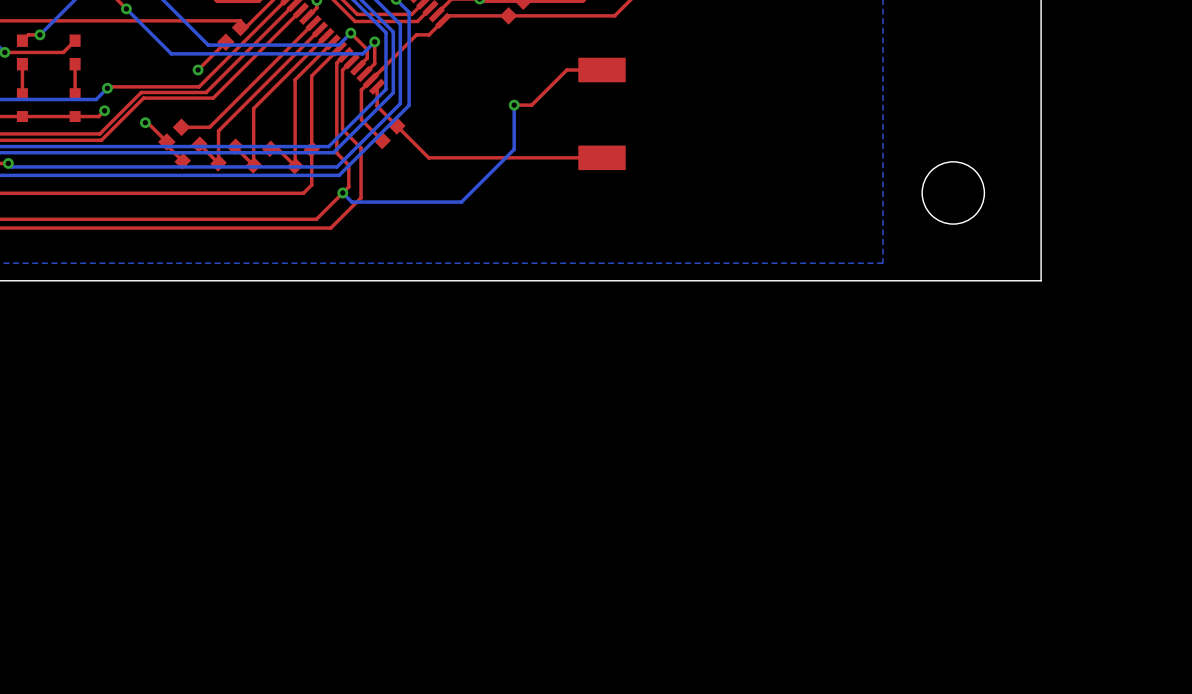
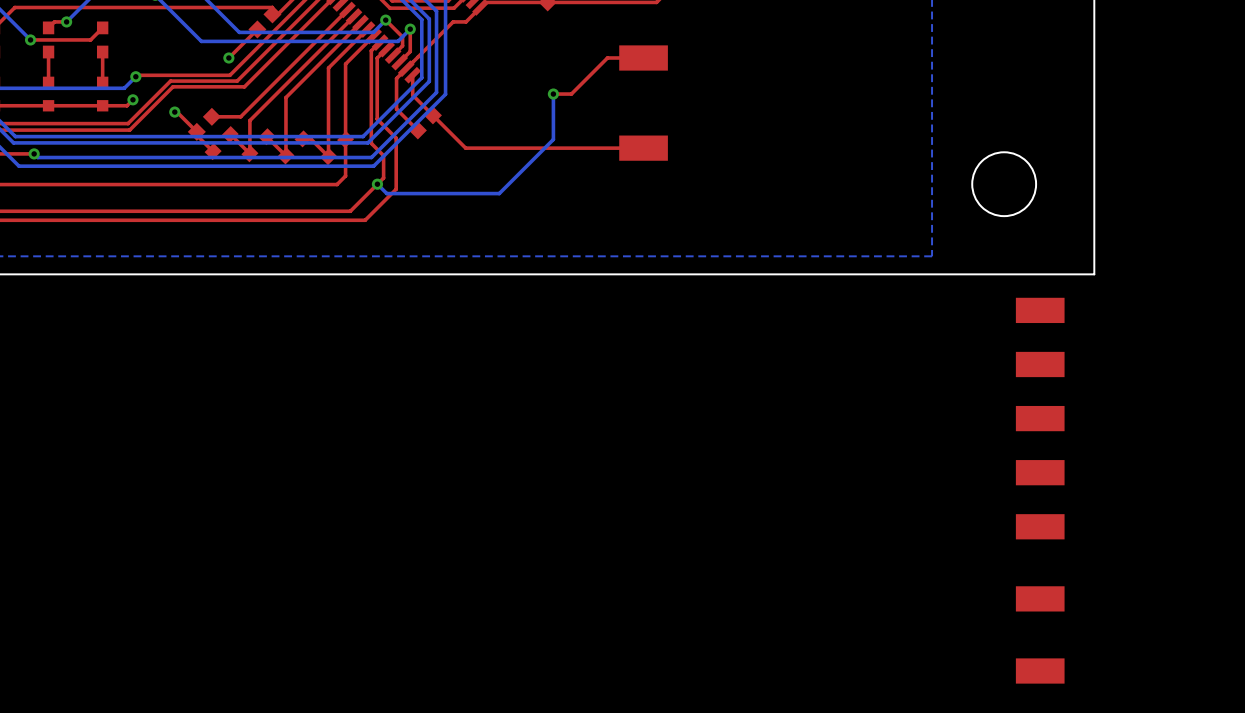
part: none -> (1040, 310)
part: none -> (1040, 364)
part: none -> (1040, 418)
part: none -> (1040, 472)
part: none -> (1040, 526)
part: none -> (1040, 598)
part: none -> (1040, 671)

